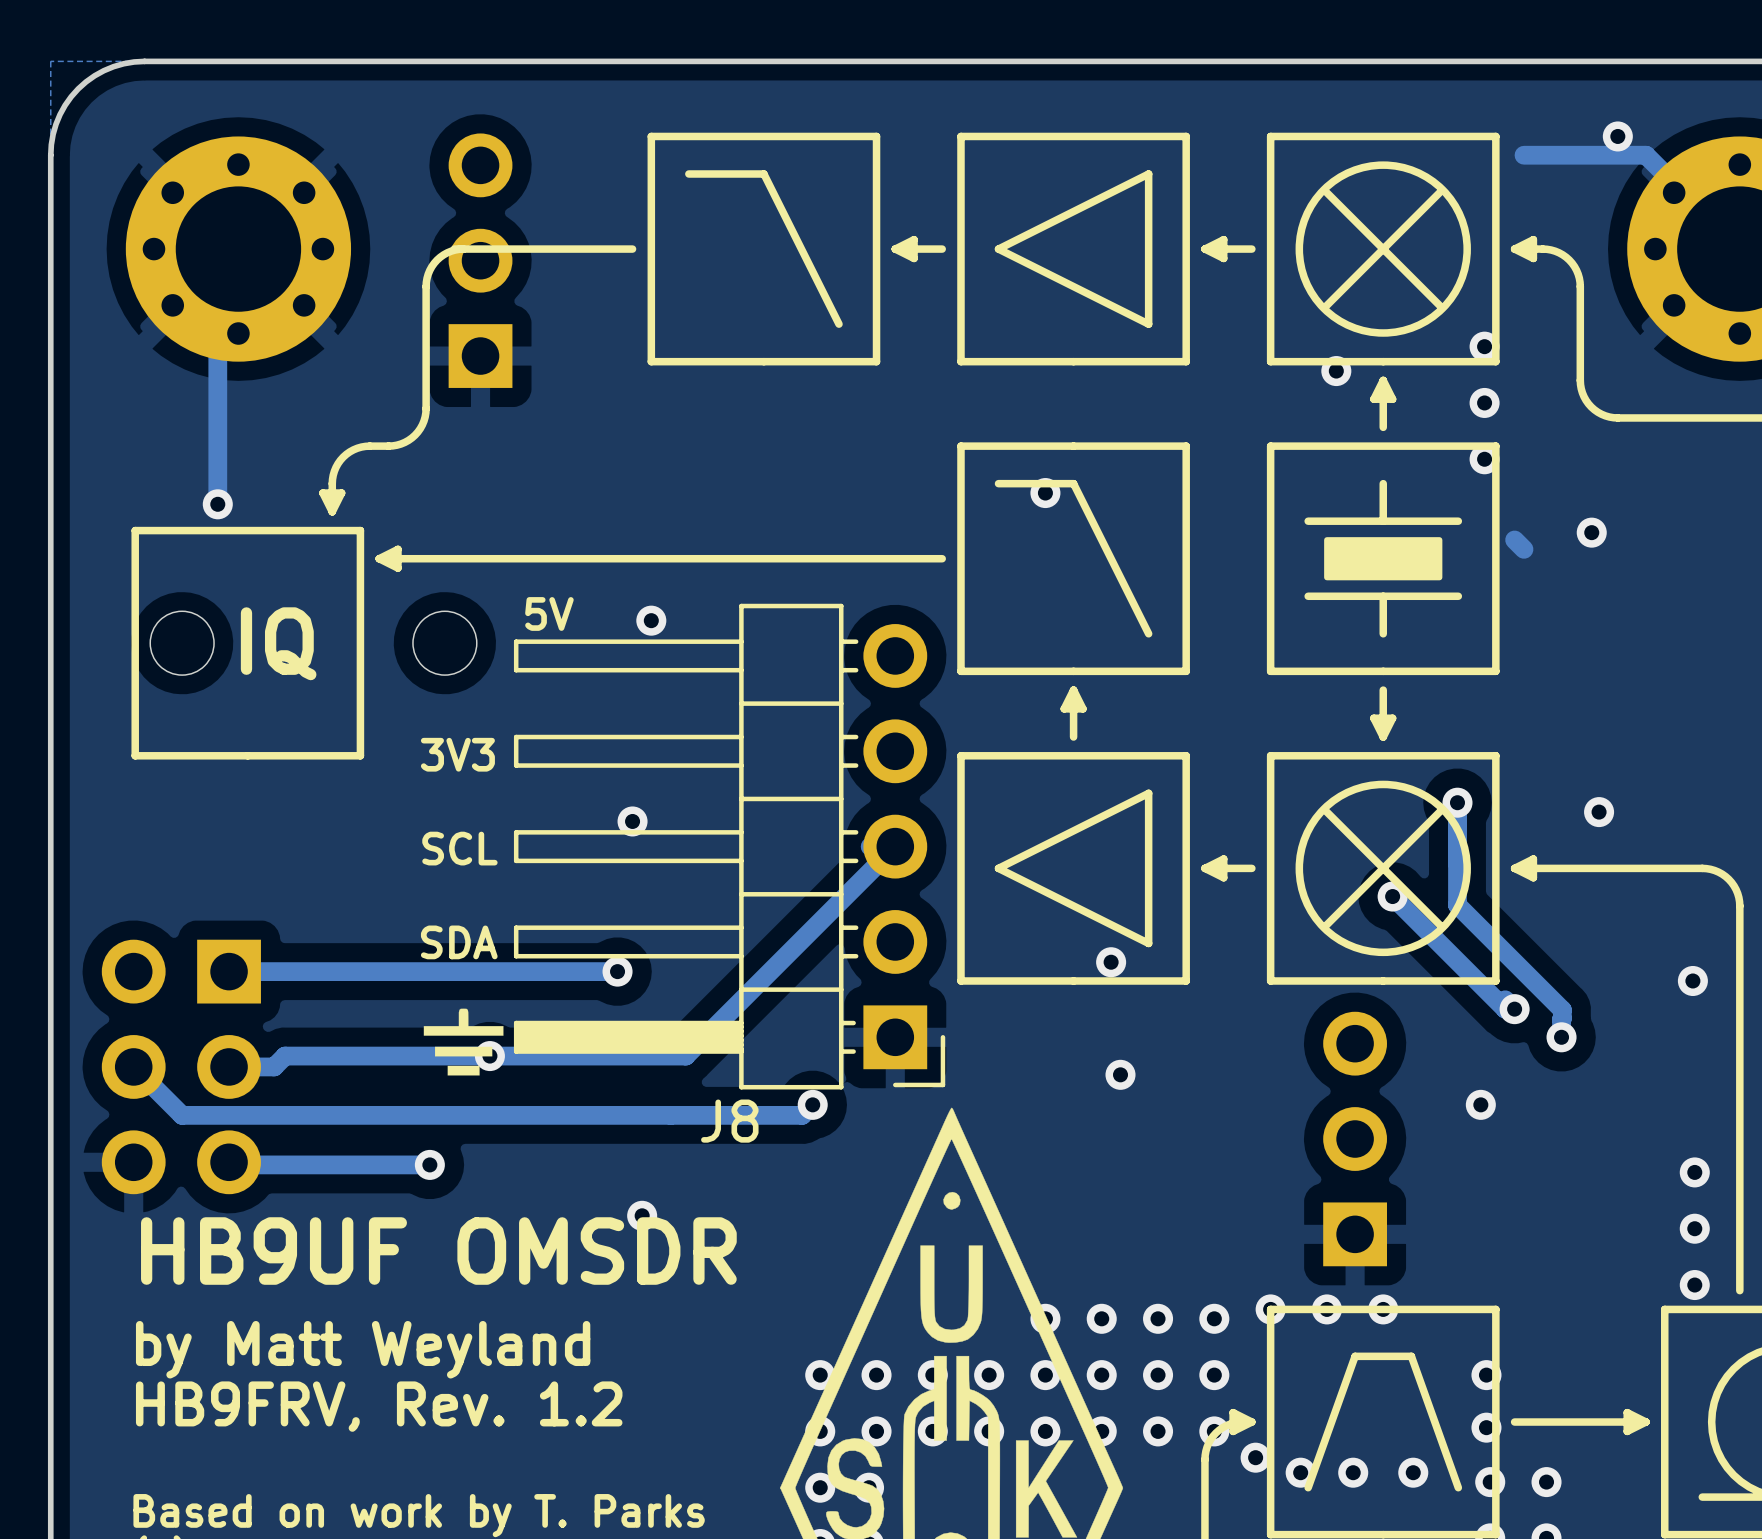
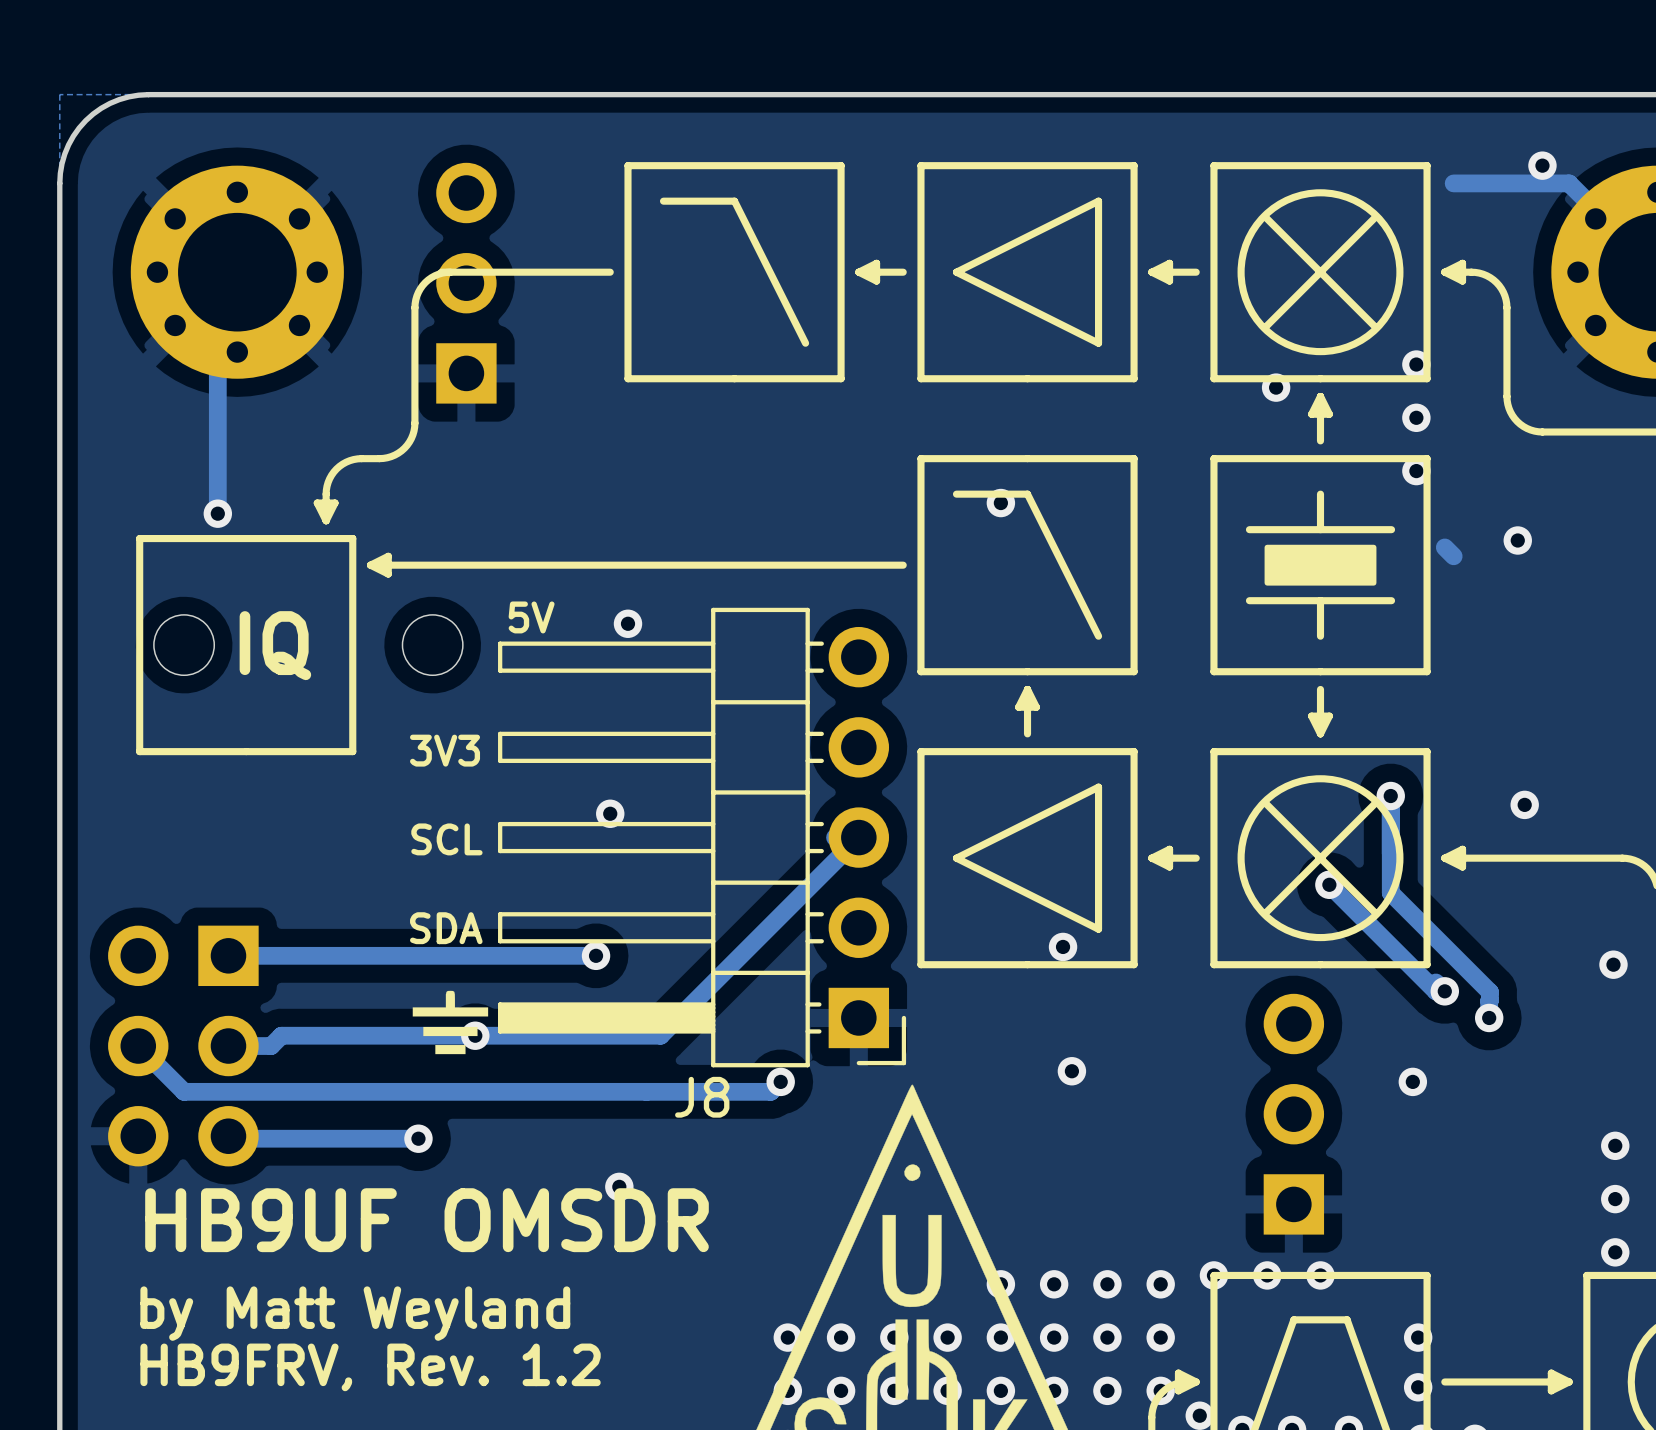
via position: (1120, 1074) -> (1071, 1071)

